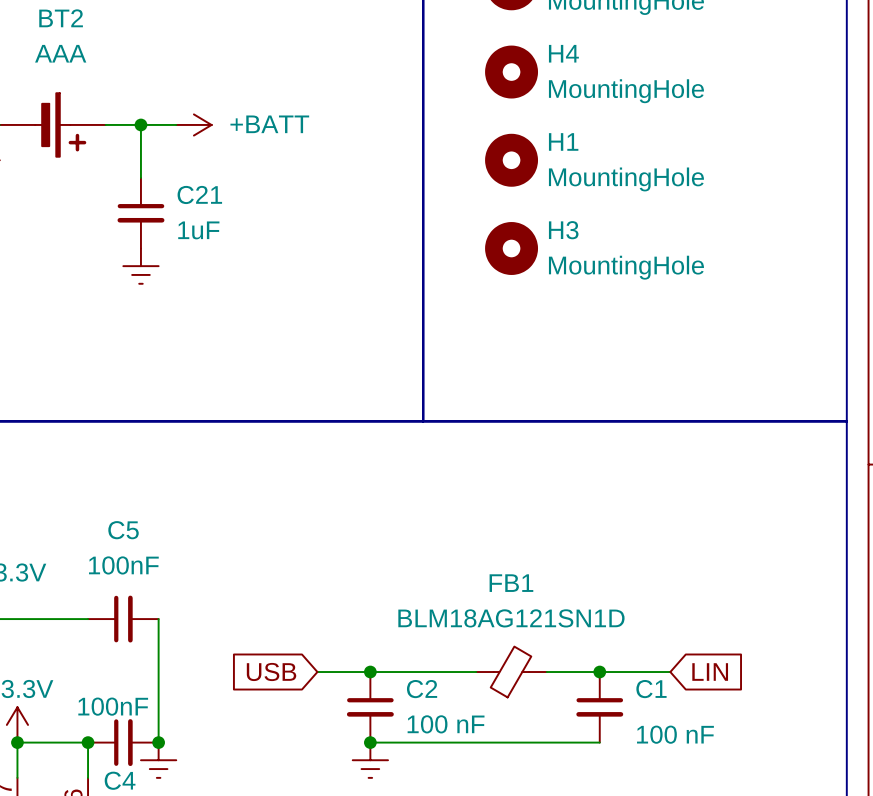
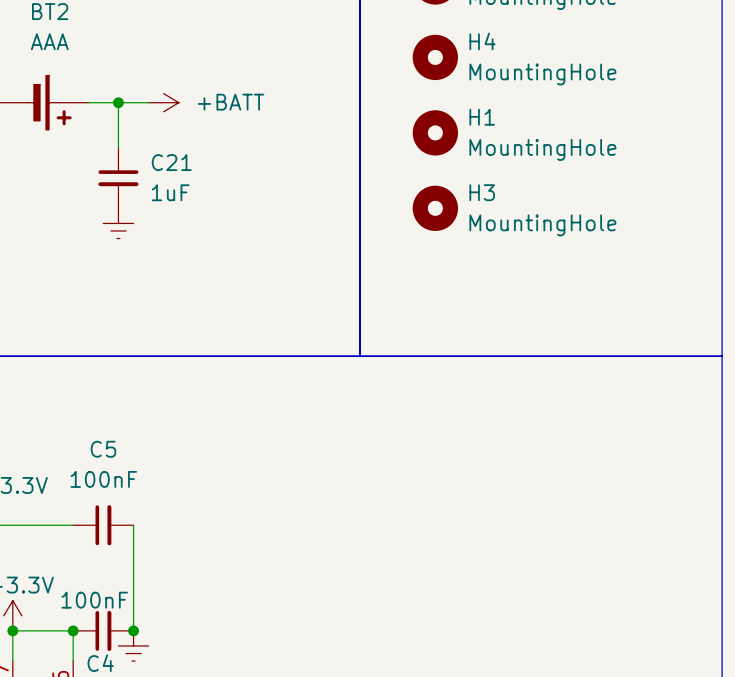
global label: USB (271, 672) -> none
wire: (317, 672) (476, 672) -> none
junction: (370, 672) -> none
FB1: BLM18AG121SN1D (511, 672) -> none
wire: (546, 672) (670, 672) -> none
junction: (599, 672) -> none
global label: LIN (710, 672) -> none
C2: 100 nF (370, 707) -> none
C1: 100 nF (599, 707) -> none
wire: (370, 742) (599, 742) -> none
junction: (370, 742) -> none
power symbol: (370, 760) -> none

